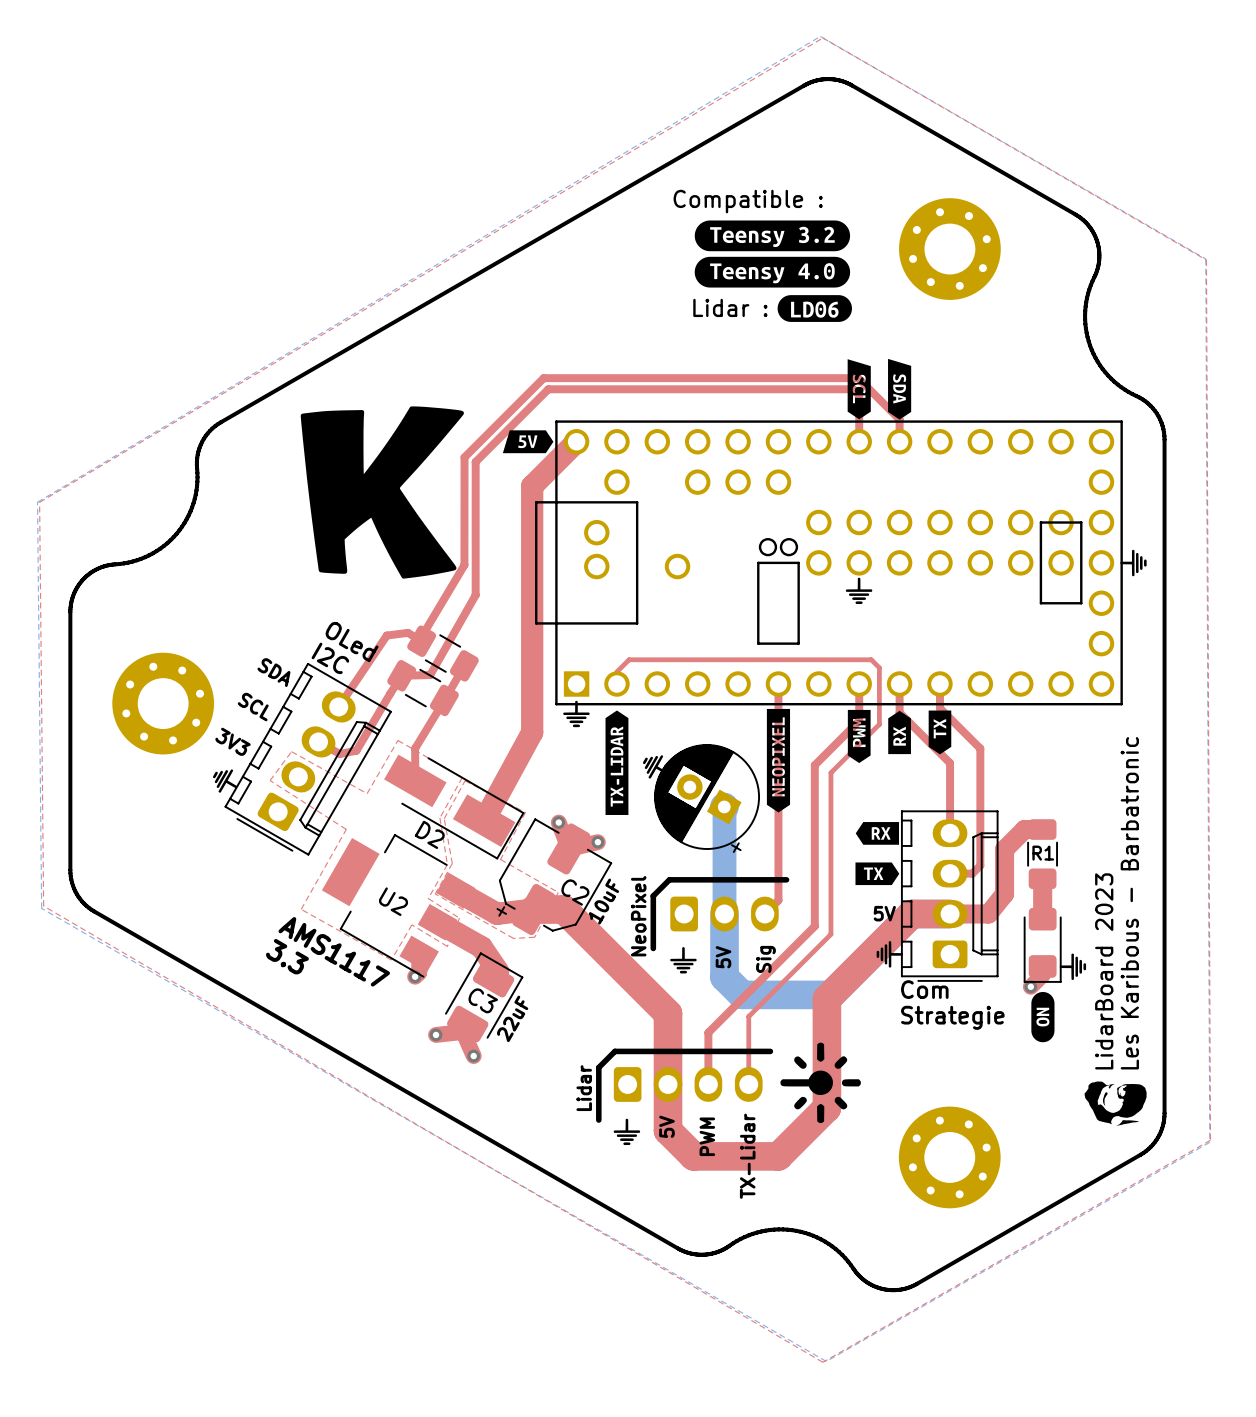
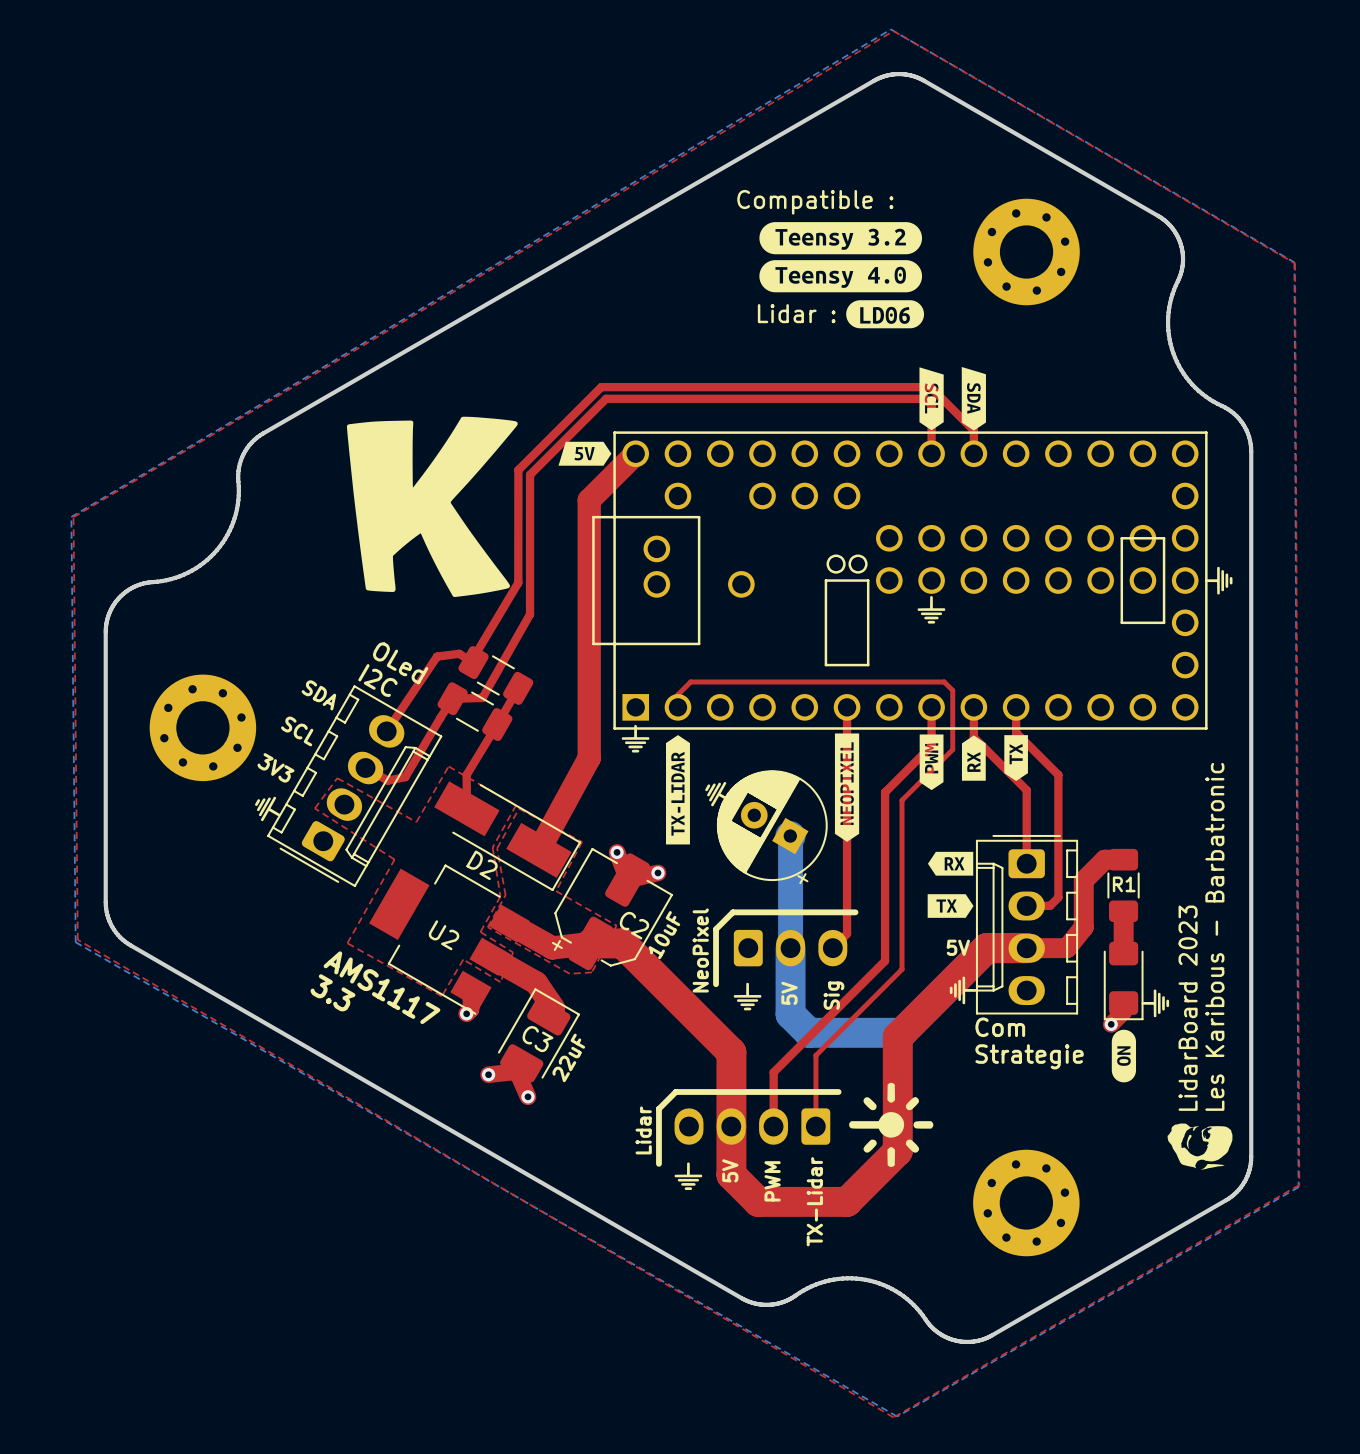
part rotation: 0° (949, 896) -> 180° (1027, 924)
part rotation: 0° (688, 1084) -> 180° (752, 1126)

